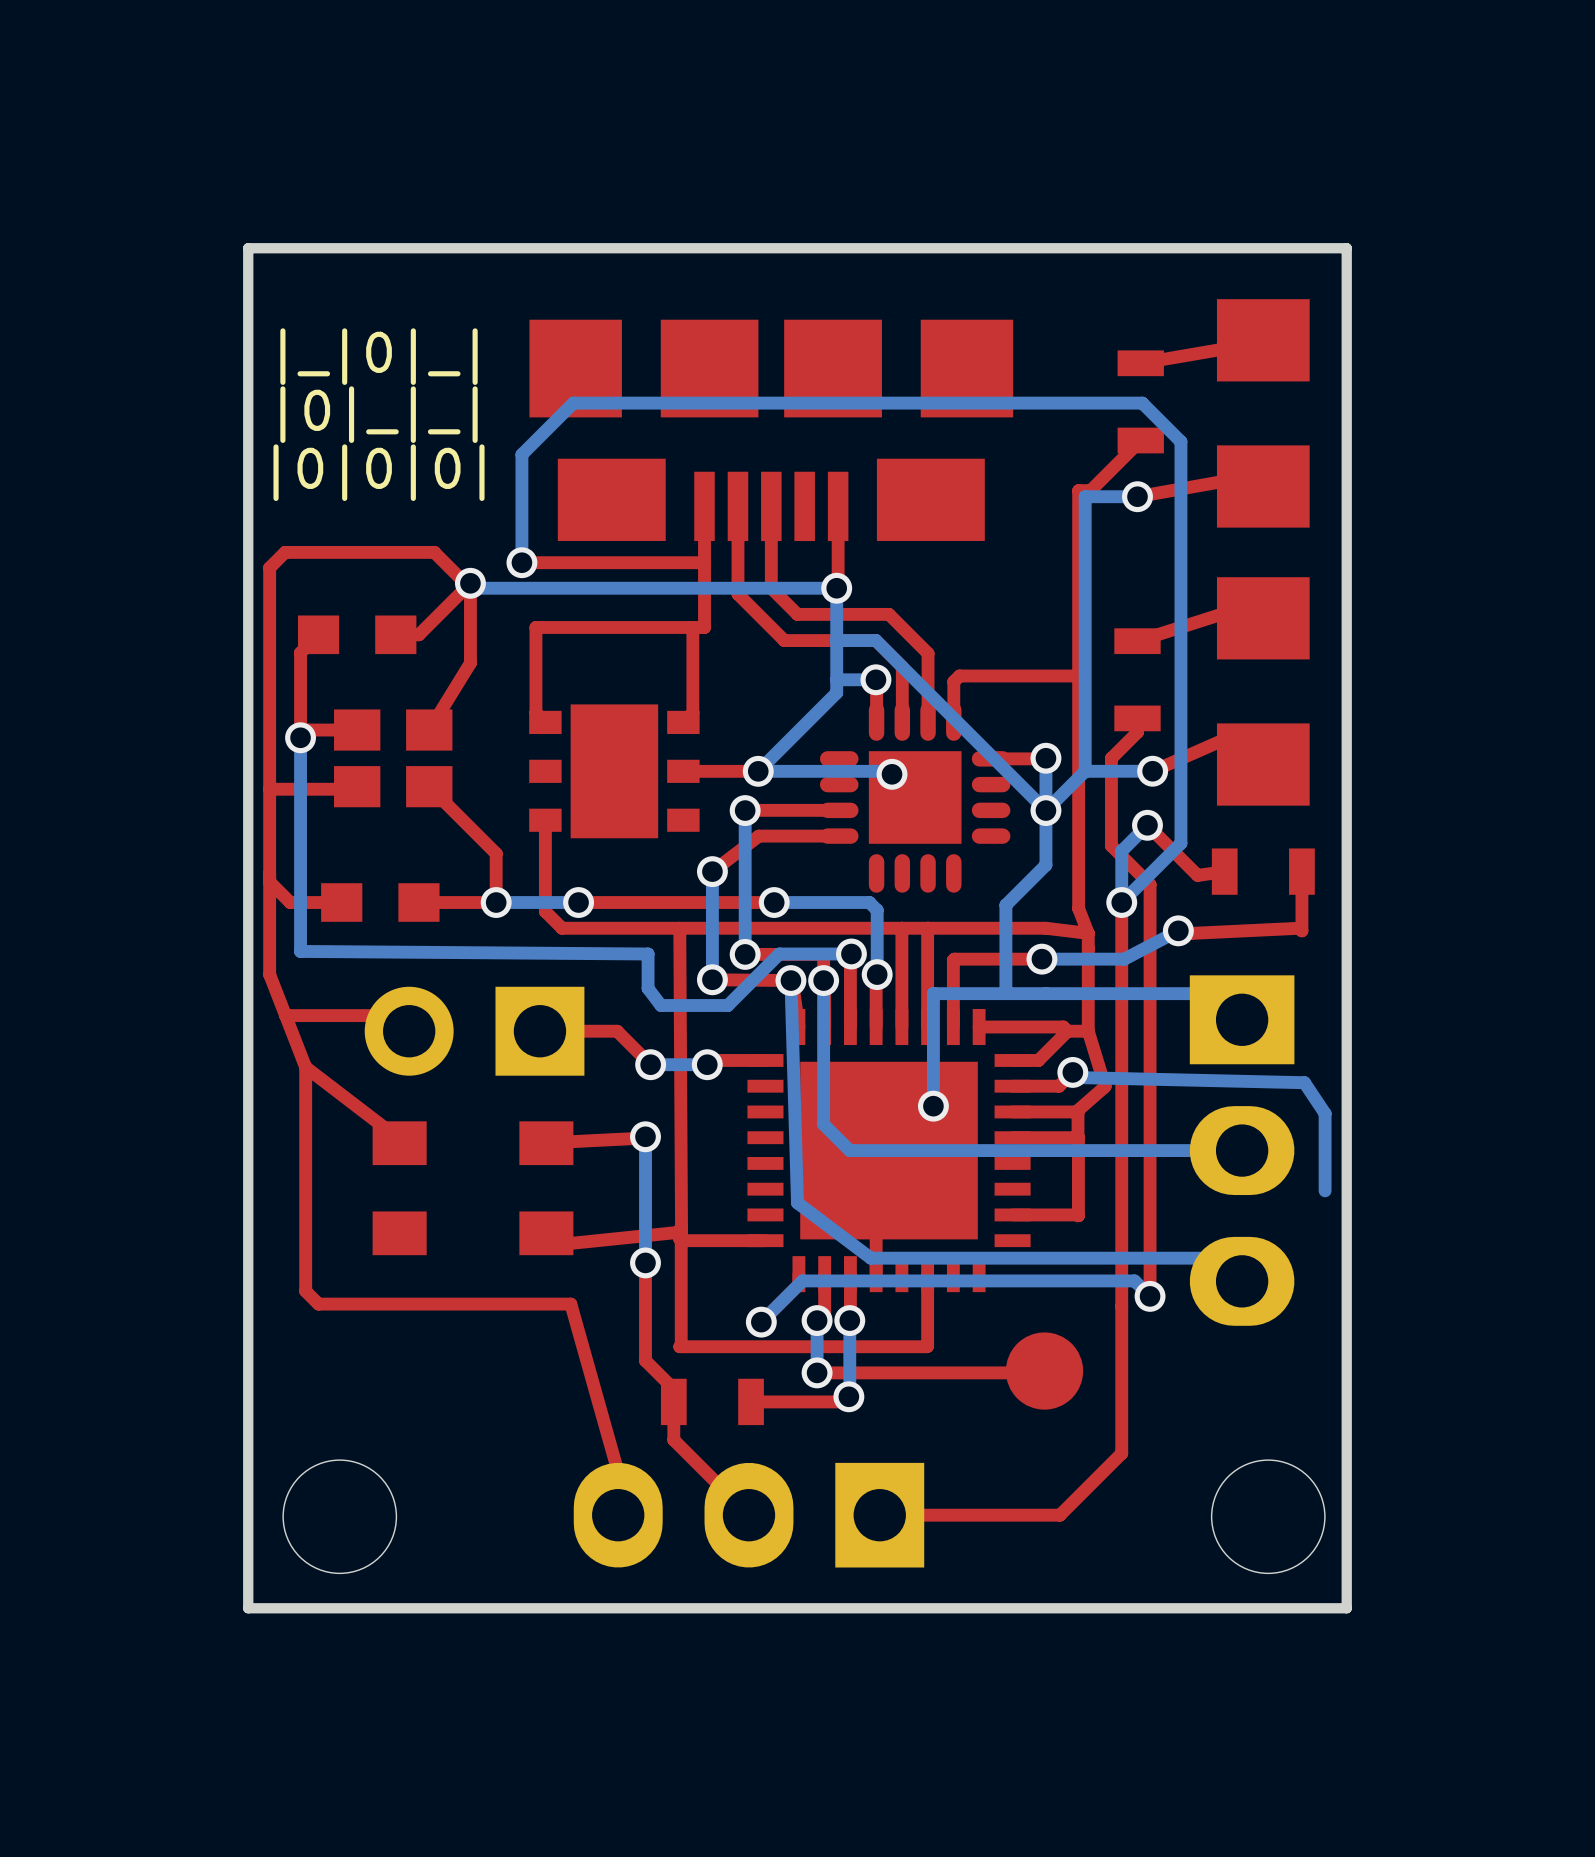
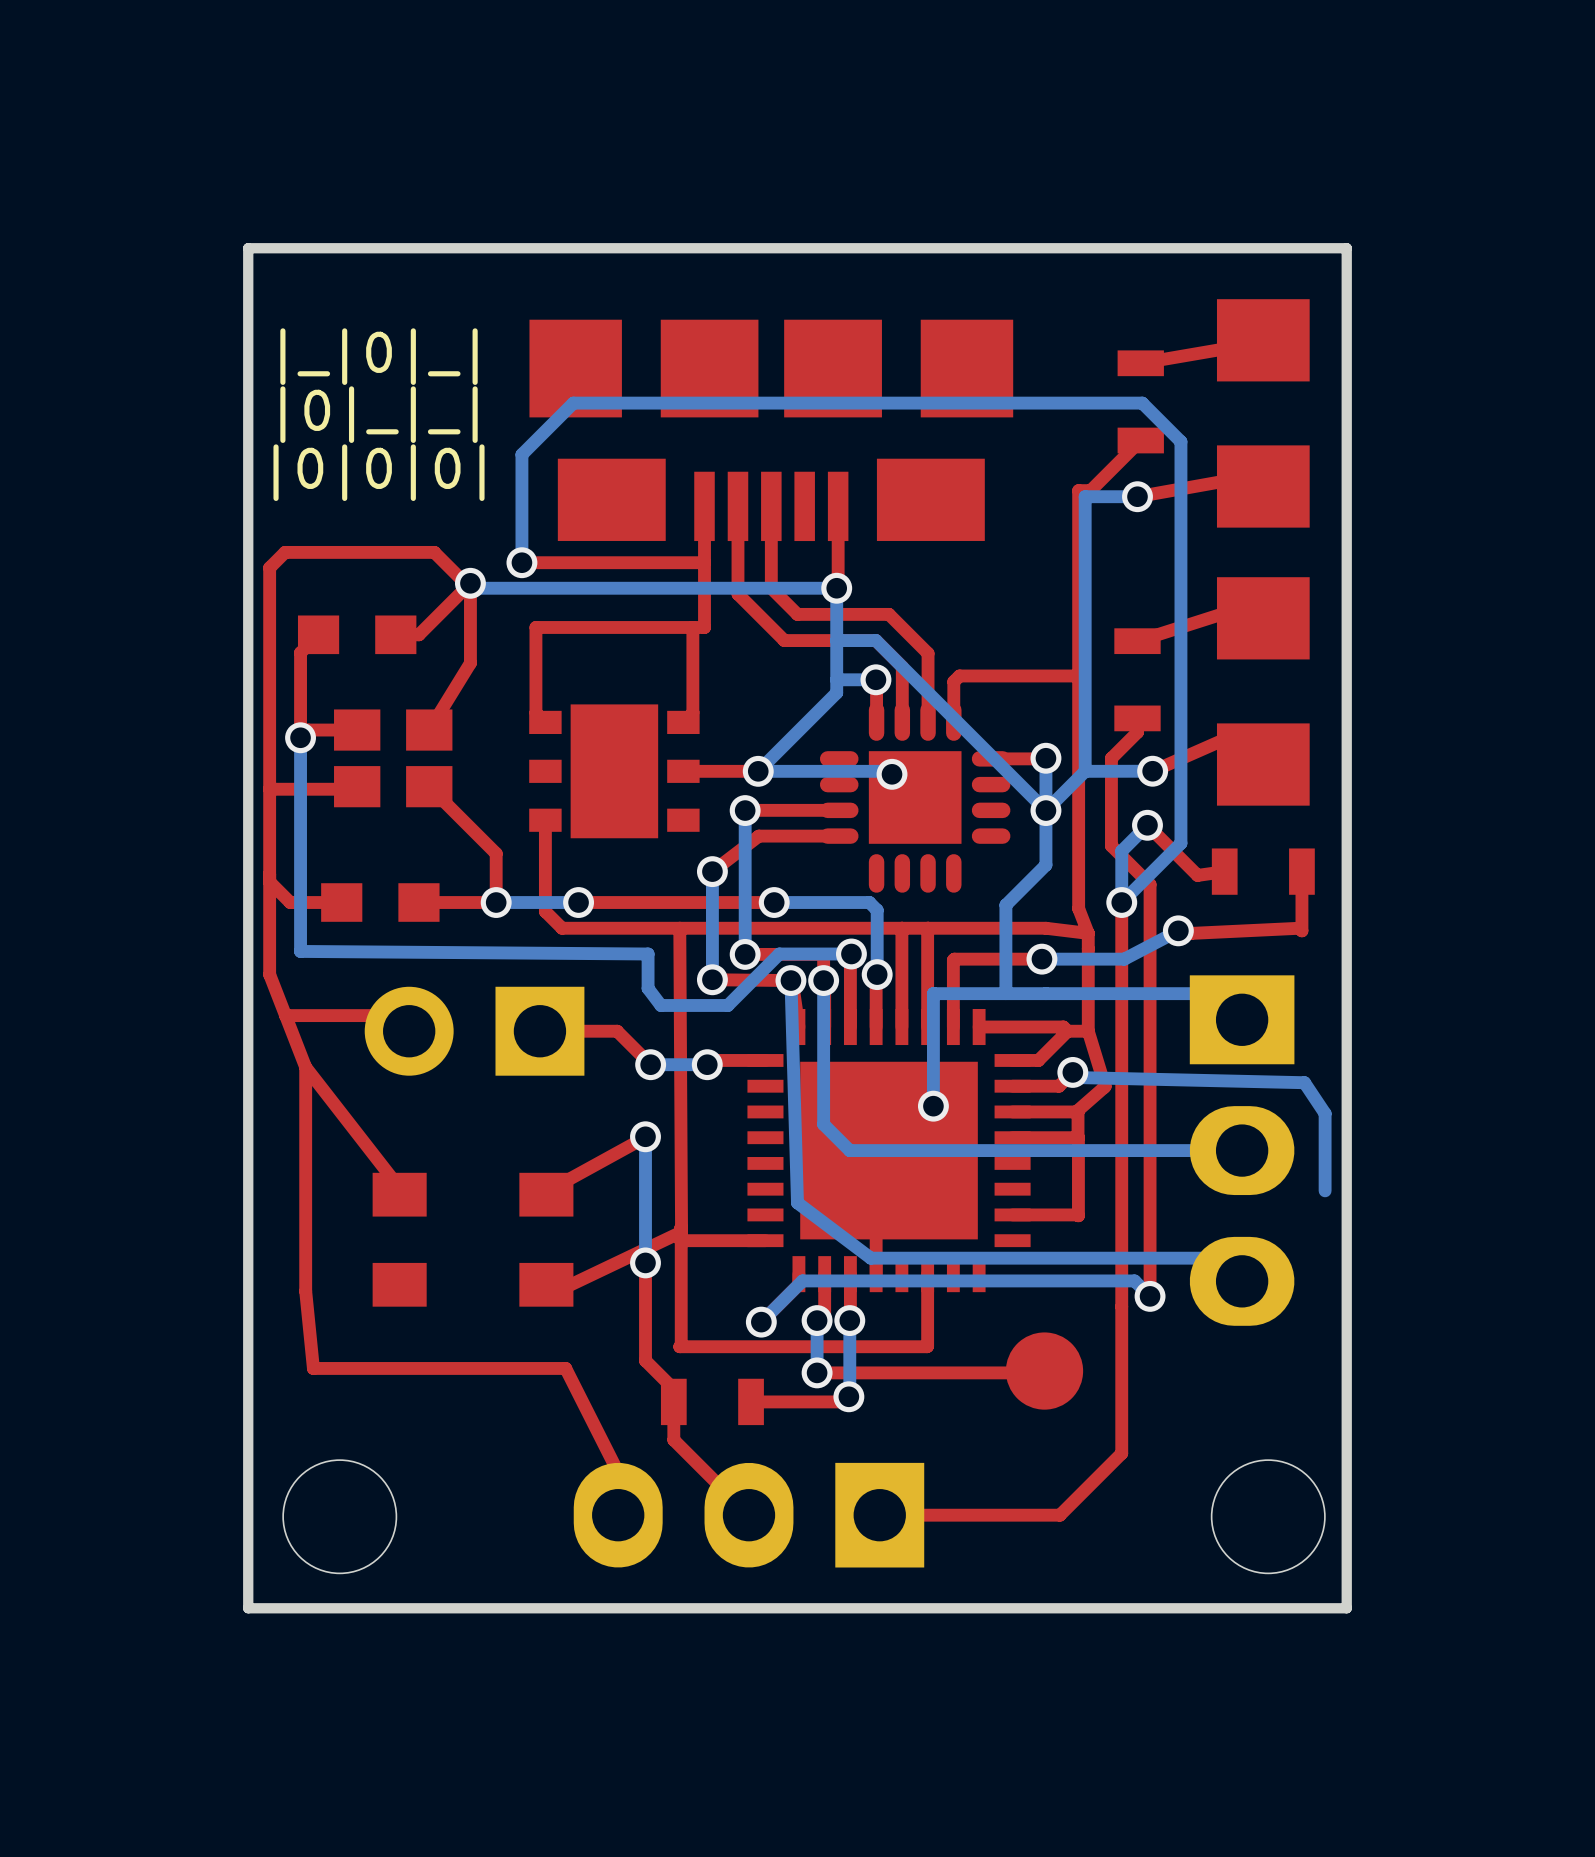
top track: (305, 1067) (404, 1143) -> (305, 1067) (404, 1194)
top track: (644, 1138) (541, 1143) -> (644, 1138) (541, 1194)
part position: (473, 1188) -> (473, 1239)
top track: (681, 1232) (543, 1246) -> (681, 1232) (543, 1297)
top track: (305, 1291) (318, 1304) (570, 1304) (618, 1472) -> (305, 1291) (313, 1368) (565, 1368) (618, 1472)

